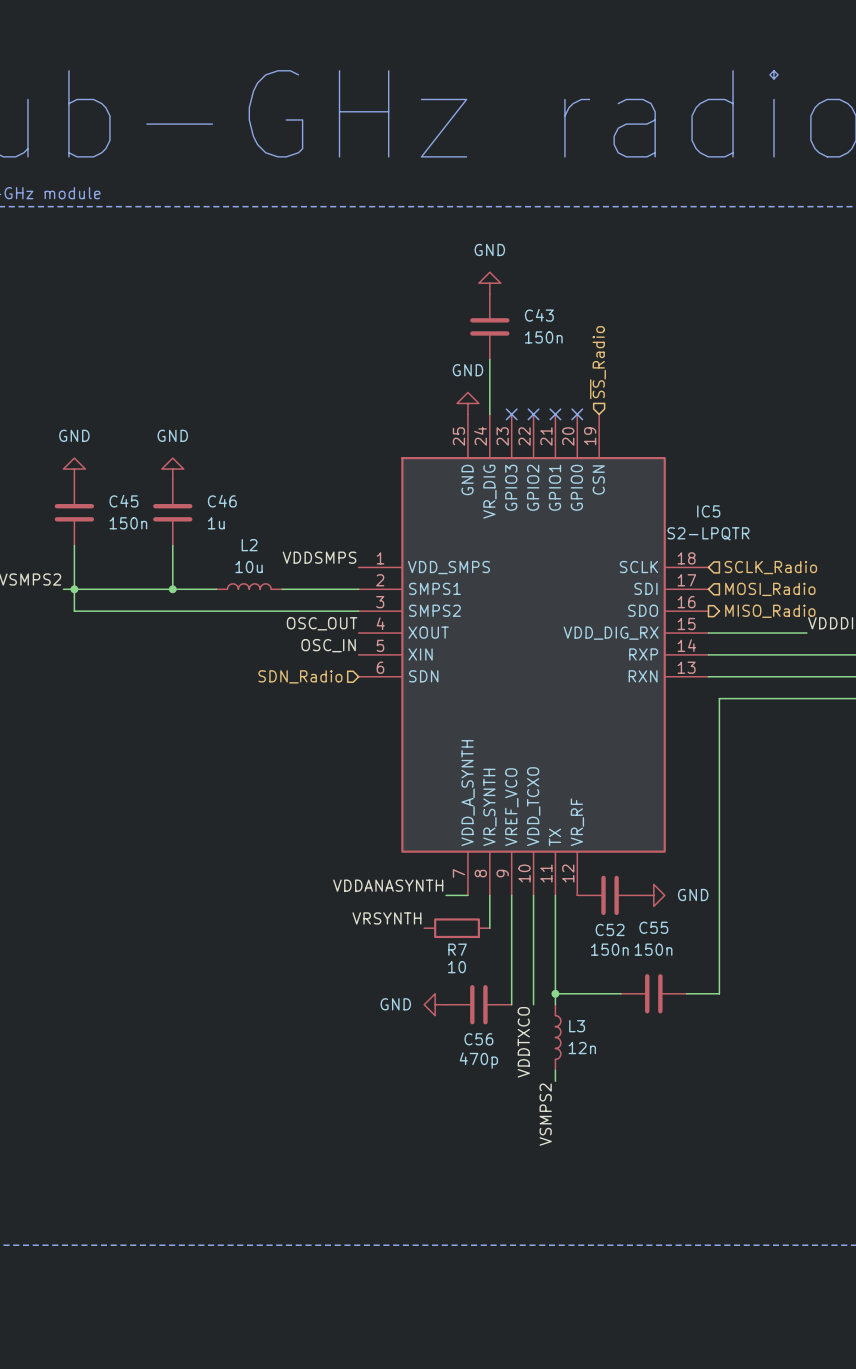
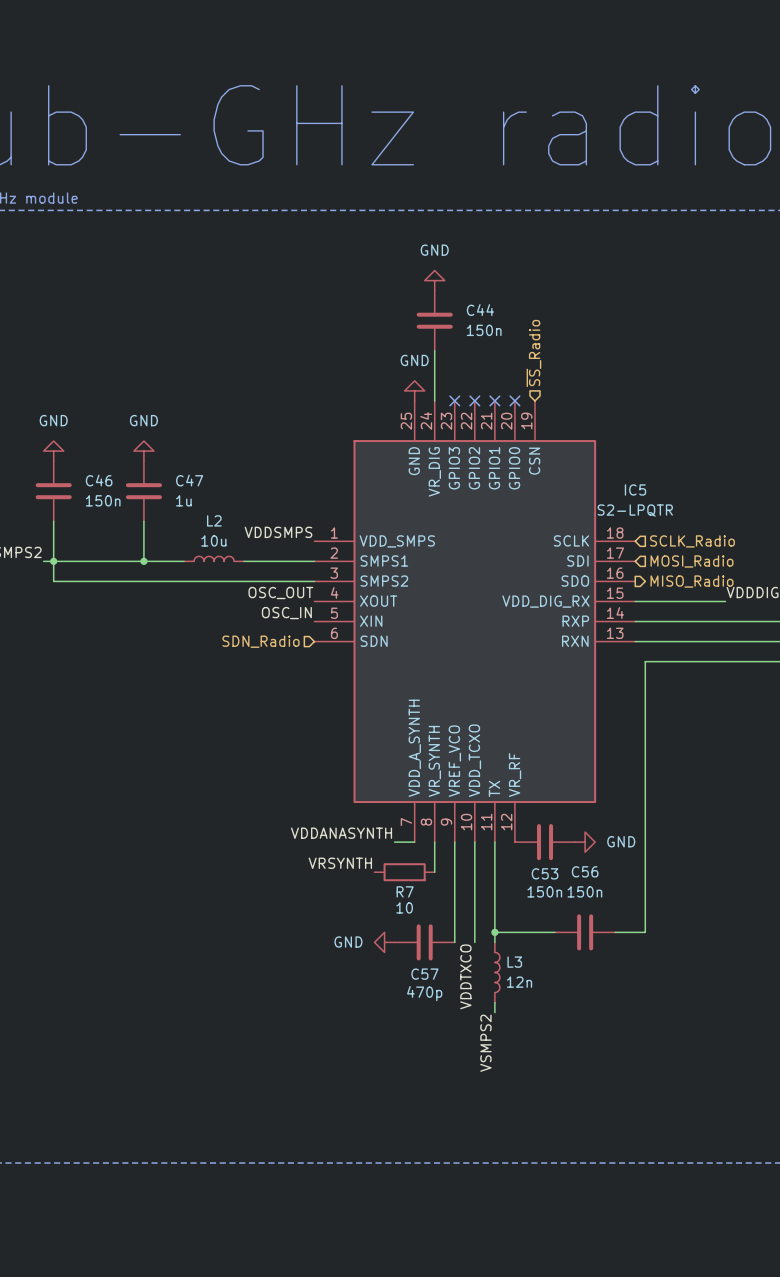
C43 name: C43 (539, 315) -> C44 (480, 310)
C45 name: C45 (123, 501) -> C46 (99, 480)
C46 name: C46 (222, 501) -> C47 (189, 480)
C55 name: C55 (653, 927) -> C56 (585, 871)
C52 name: C52 (610, 929) -> C53 (545, 873)
C56 name: C56 (478, 1039) -> C57 (424, 974)

